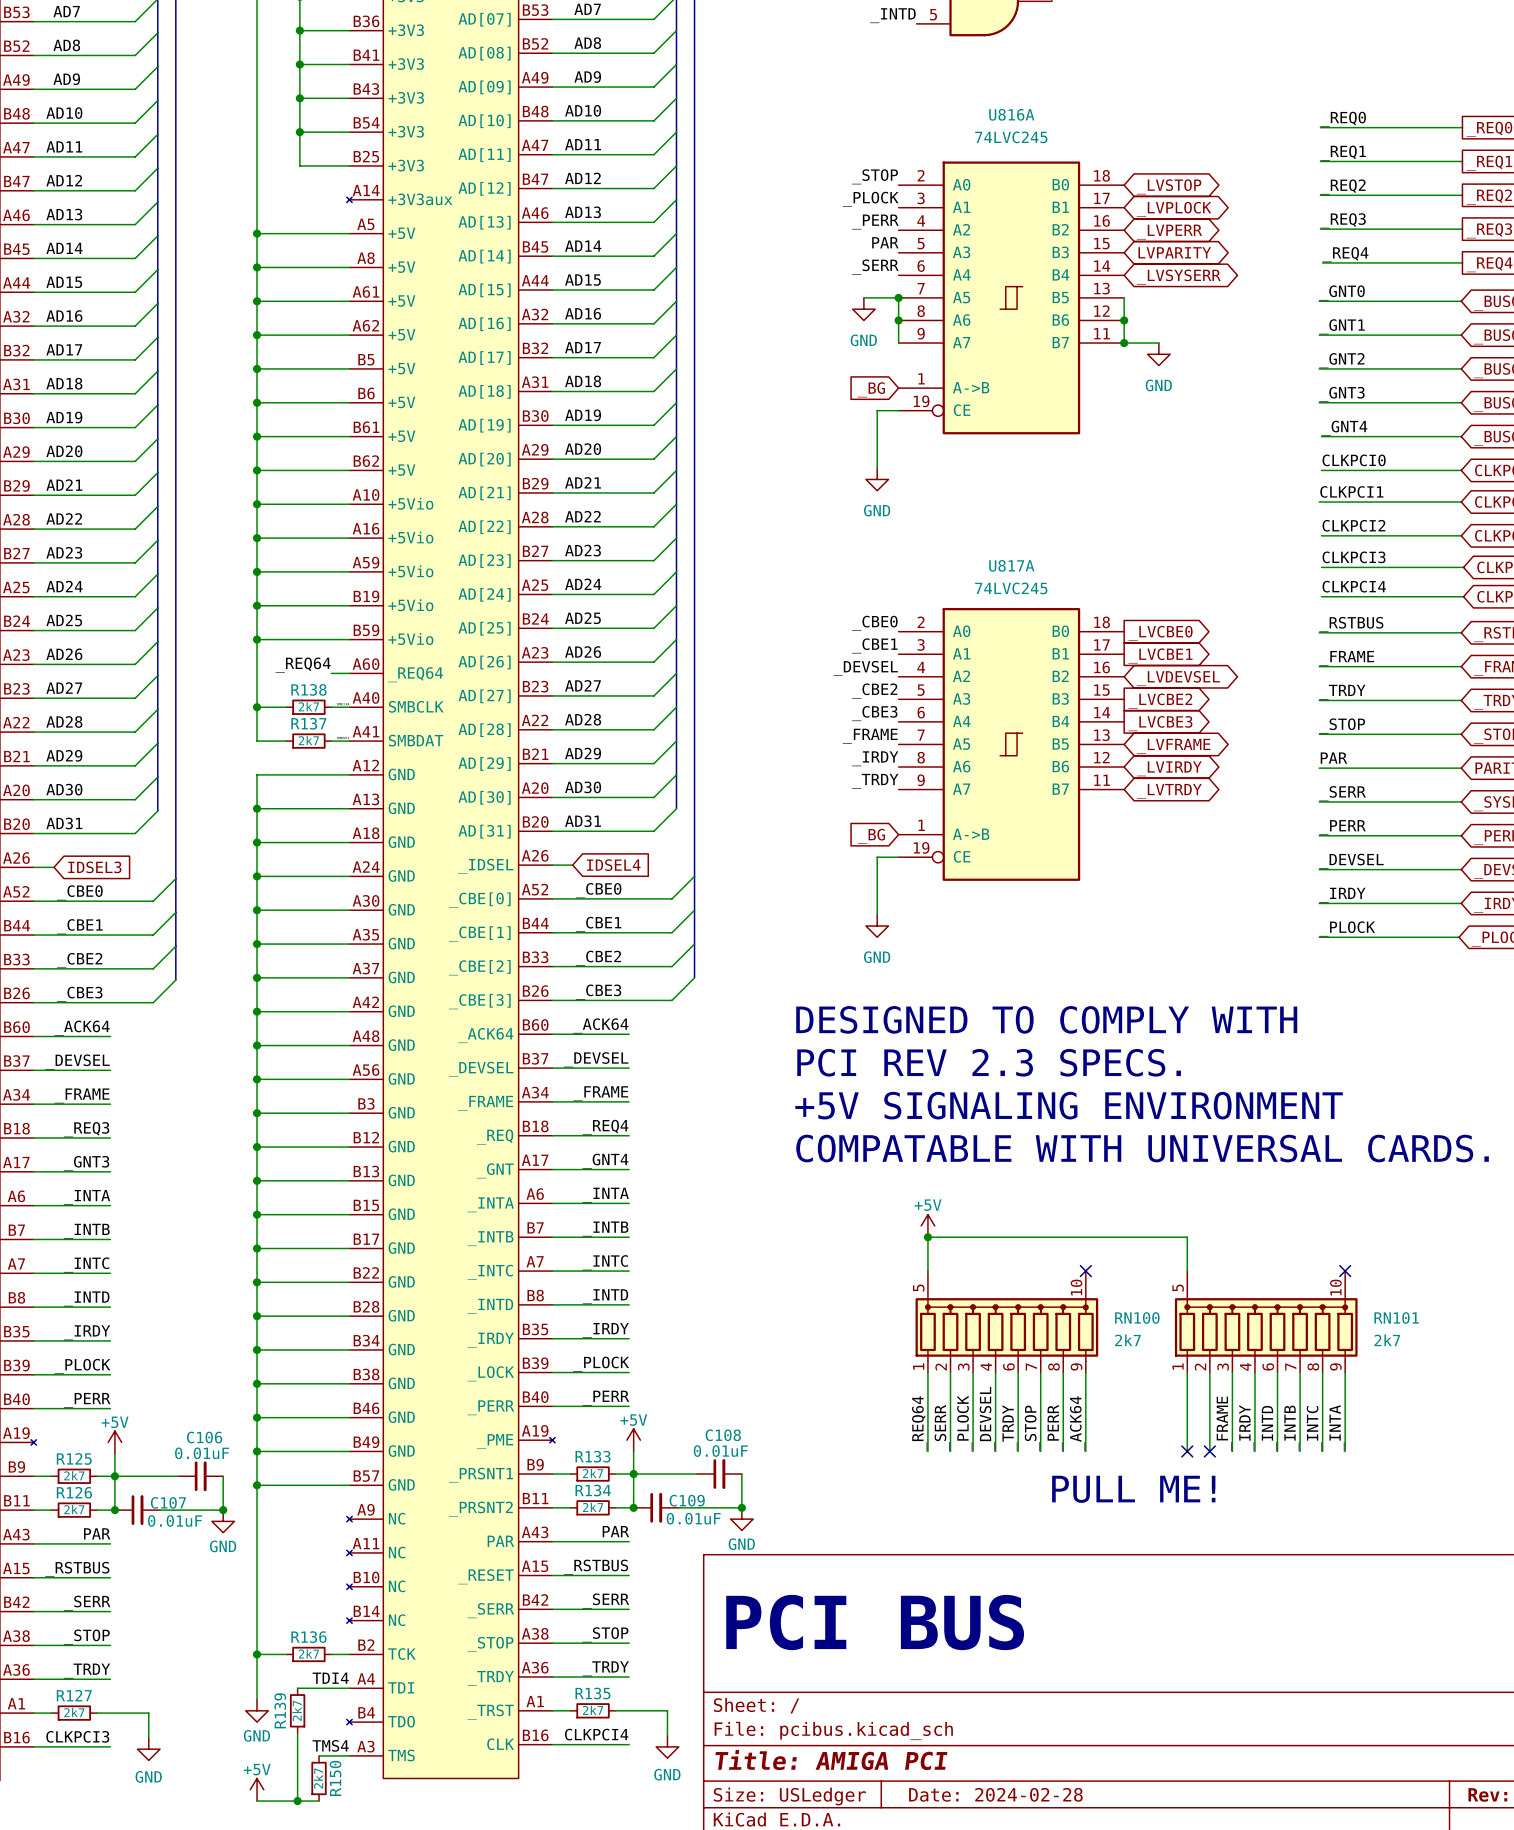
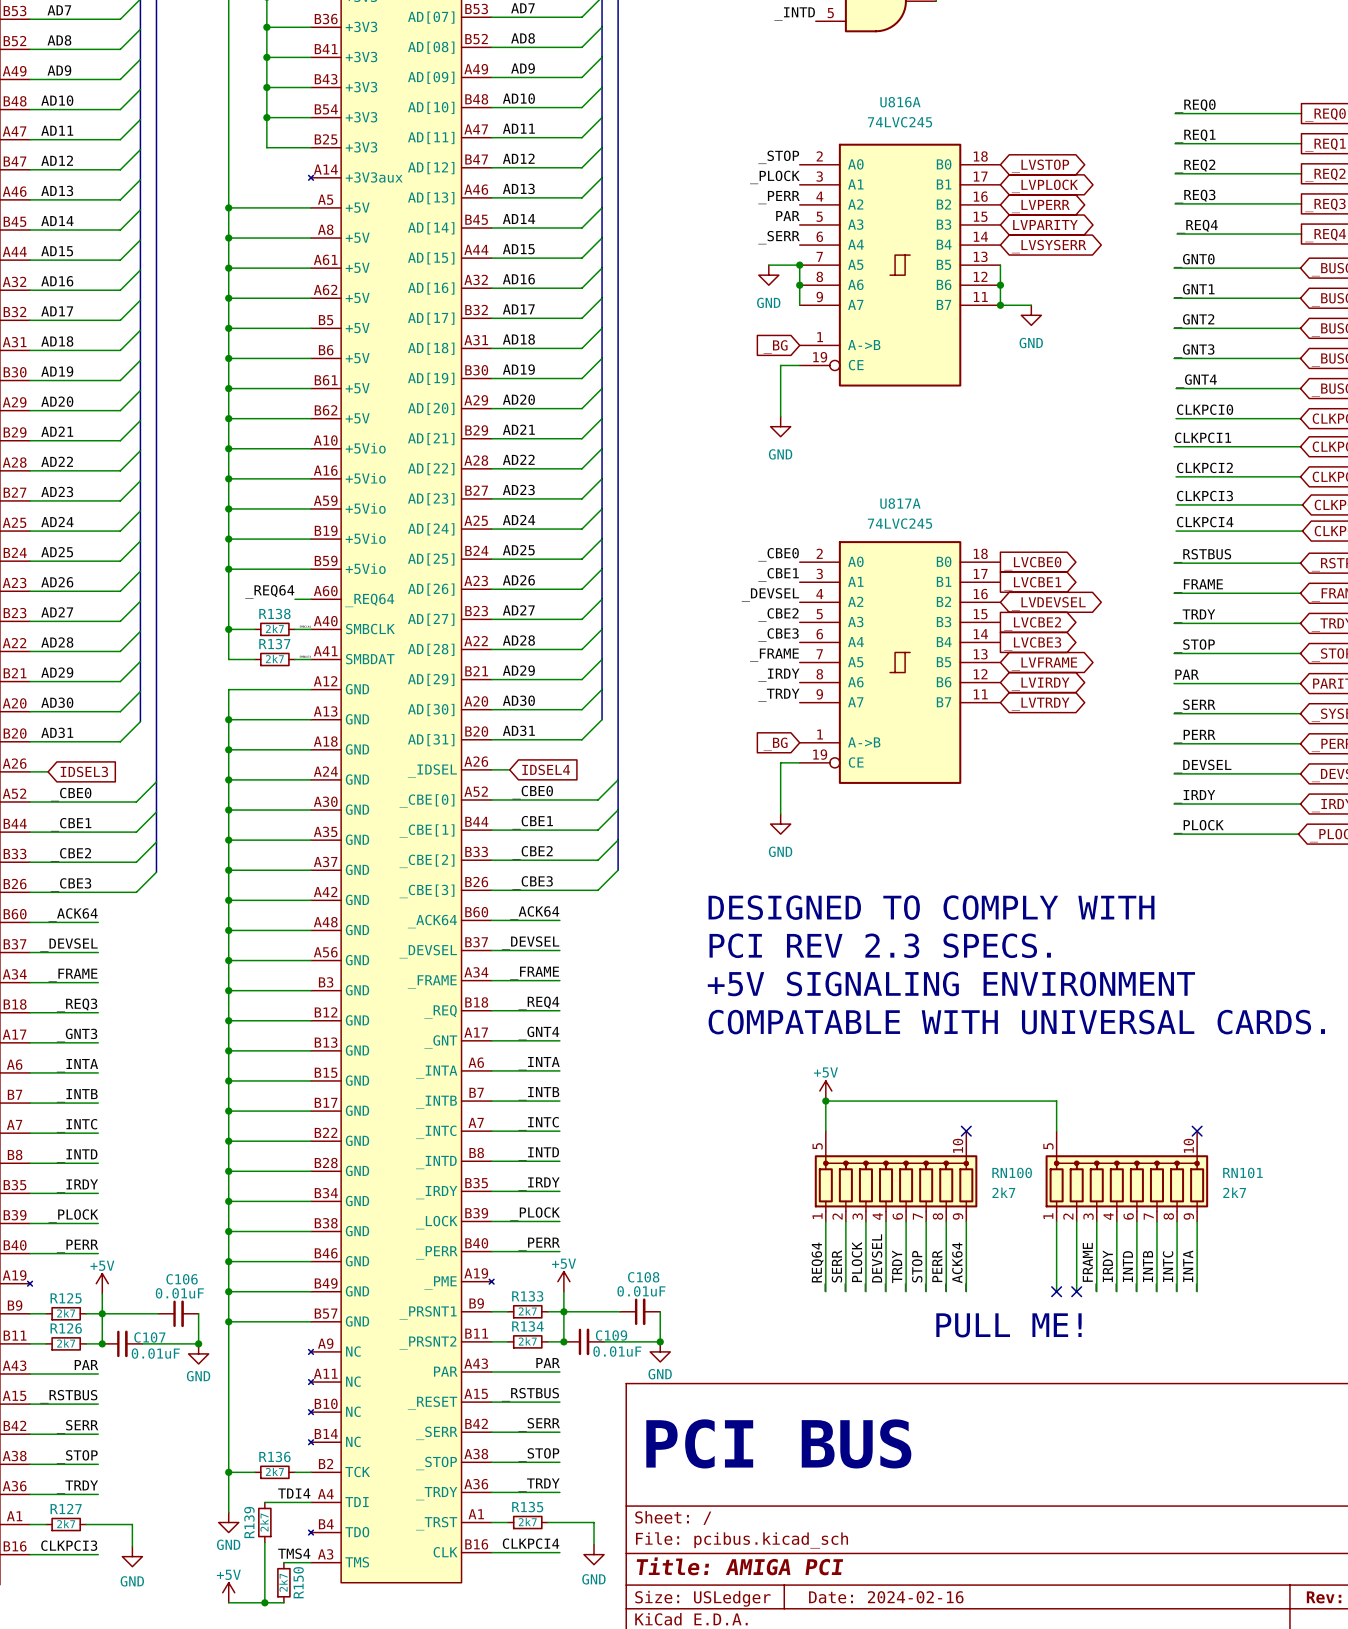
title block: Date: 2024-02-28 (995, 1794) -> Date: 2024-02-16 (886, 1597)

